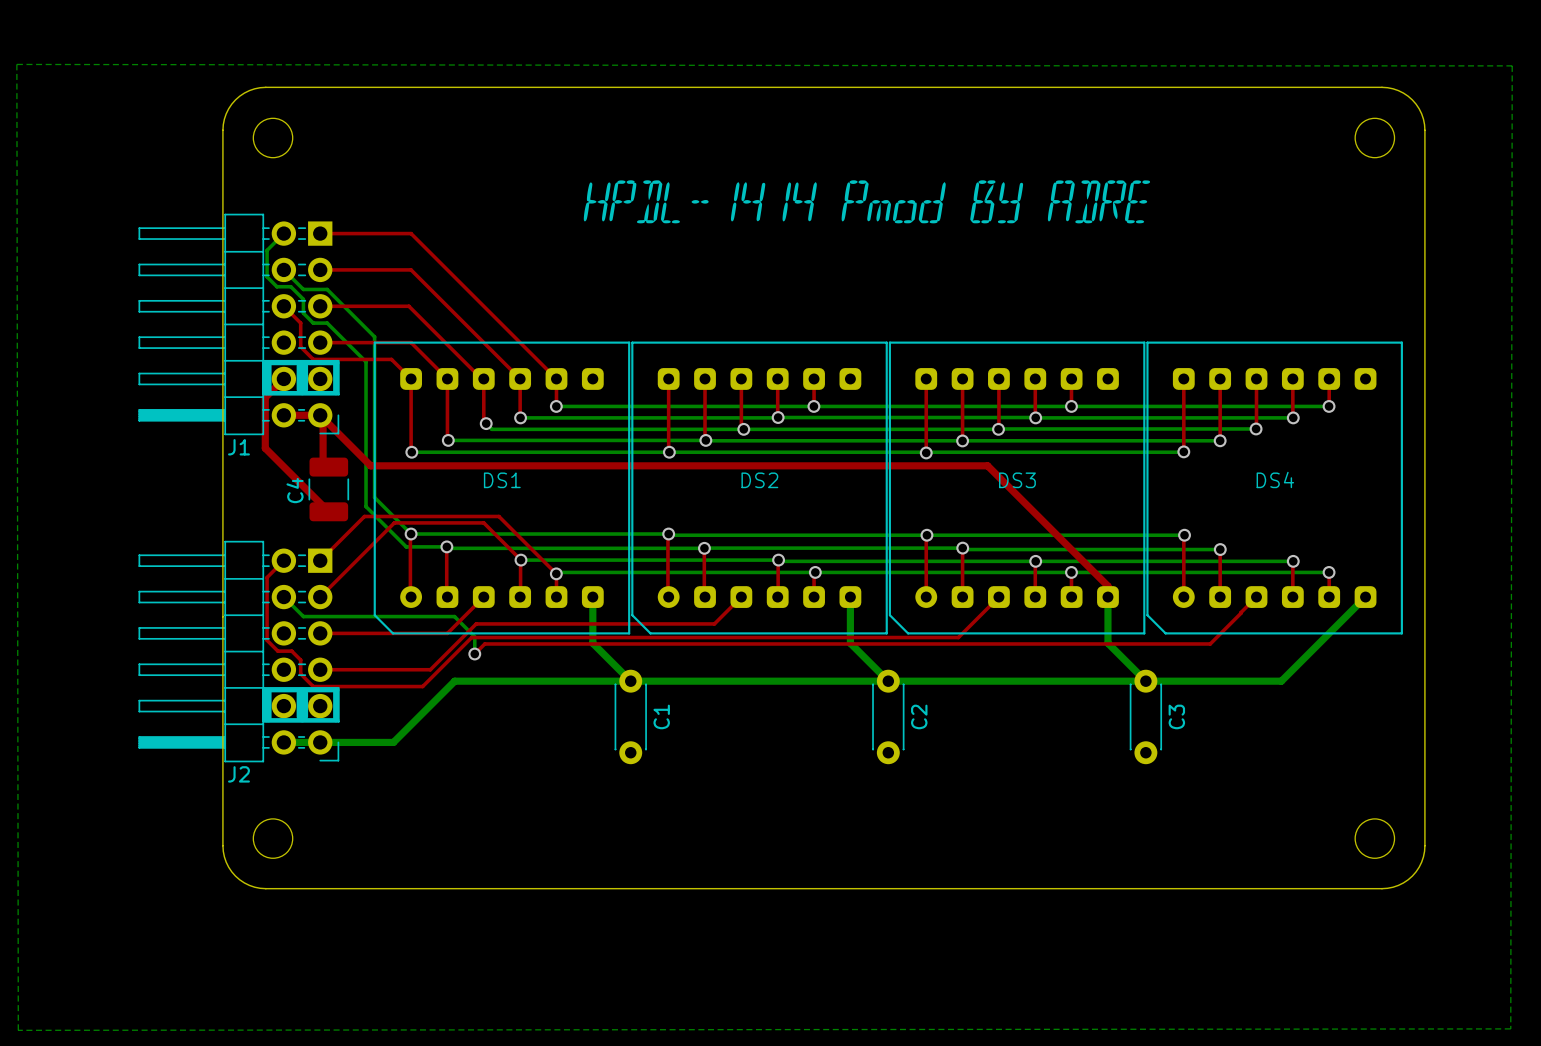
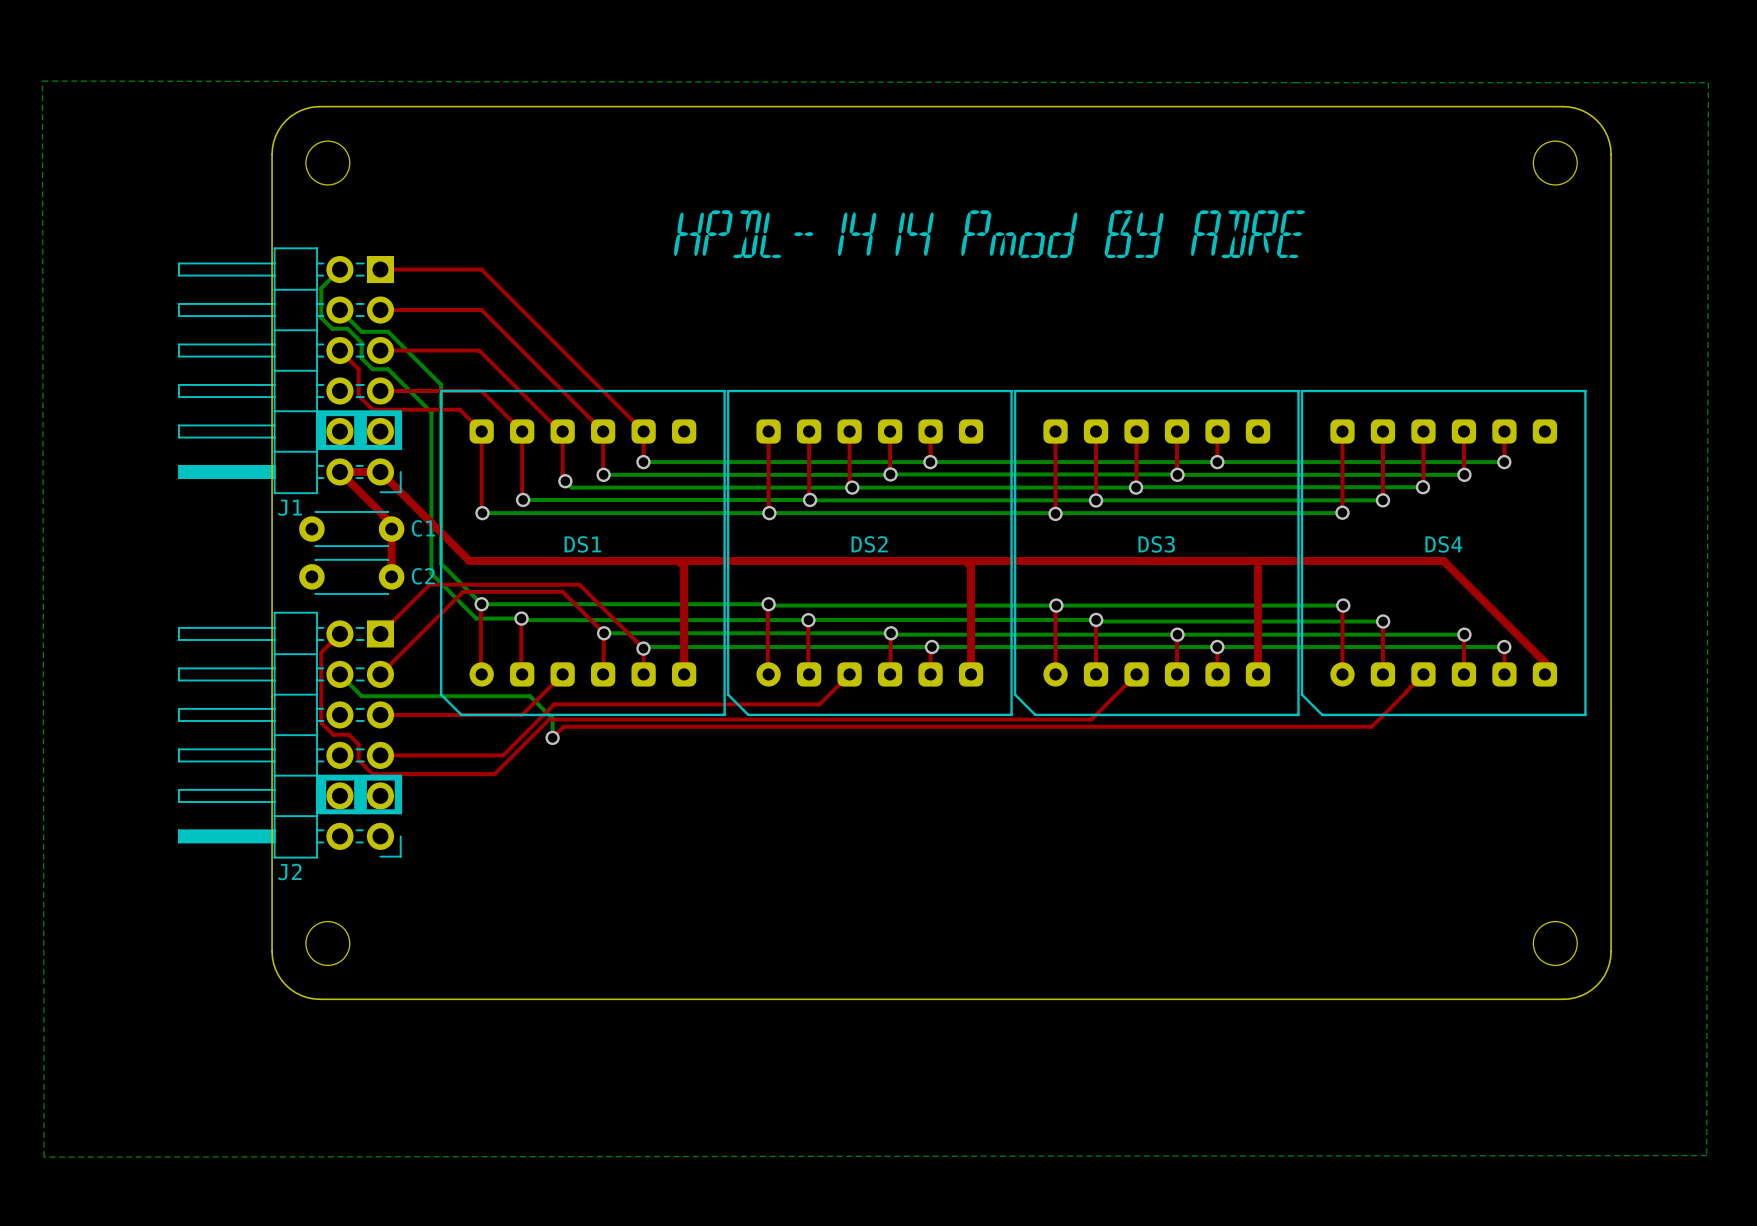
top track: (283, 378) (265, 397) (265, 448) (328, 511) -> none
top track: none -> (339, 471) (391, 523) (391, 573) (387, 576)
top track: (323, 418) (323, 461) (328, 467) -> none
top track: (370, 465) (987, 465) (1107, 586) -> (436, 528) (469, 560) (1443, 560) (1544, 662) (1544, 674)
C4: (328, 489) -> none
top track: none -> (678, 560) (684, 566) (684, 674)
top track: none -> (965, 560) (971, 566) (971, 674)
top track: none -> (1258, 560) (1258, 662)
bottom track: (592, 597) (592, 643) (630, 681) -> none
bottom track: (850, 597) (850, 643) (888, 681) -> none
bottom track: (1107, 597) (1107, 643) (1145, 681) -> none
bottom track: (1365, 597) (1281, 681) (454, 681) (393, 742) (283, 742) -> none
C1 rotation: 0° (630, 716) -> 90° clockwise (351, 529)
C1 position: (630, 716) -> (351, 529)
C1 name position: C1 (661, 716) -> C1 (423, 528)
C2 rotation: 0° (888, 716) -> 90° clockwise (351, 576)
C2 position: (888, 716) -> (351, 576)
C2 name position: C2 (919, 716) -> C2 (423, 576)
C3: (1145, 716) -> none

